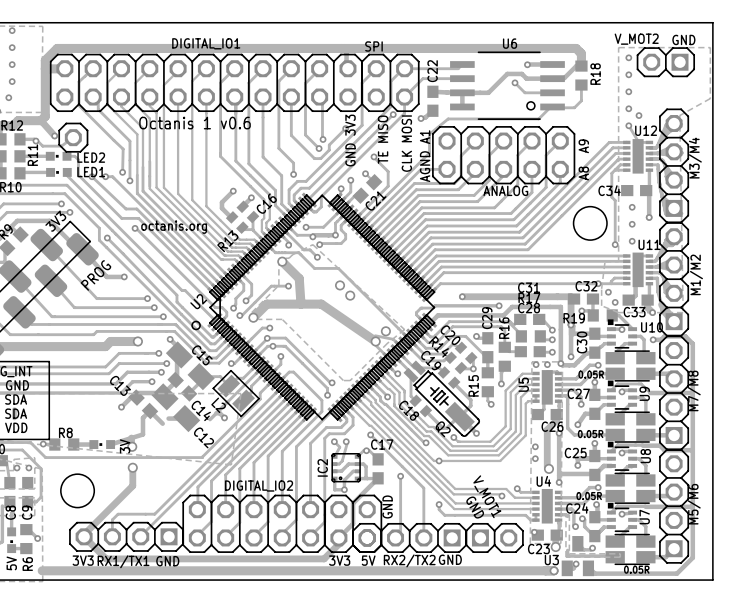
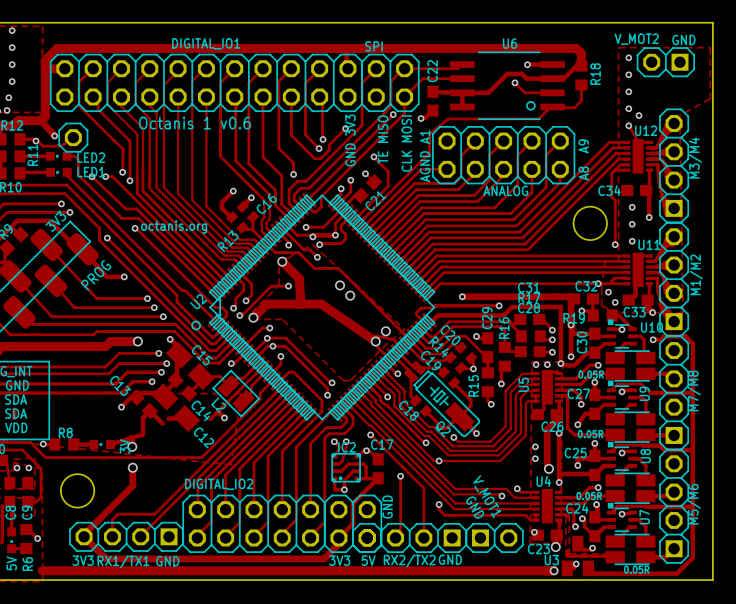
via: none -> (7, 110)
IC2 name rotation: 0° (322, 467) -> 90° clockwise (346, 447)
IC2 name position: IC2 (322, 467) -> IC2 (346, 447)
DIGITAL_IO2 name position: DIGITAL_IO2 (259, 486) -> DIGITAL_IO2 (219, 484)

